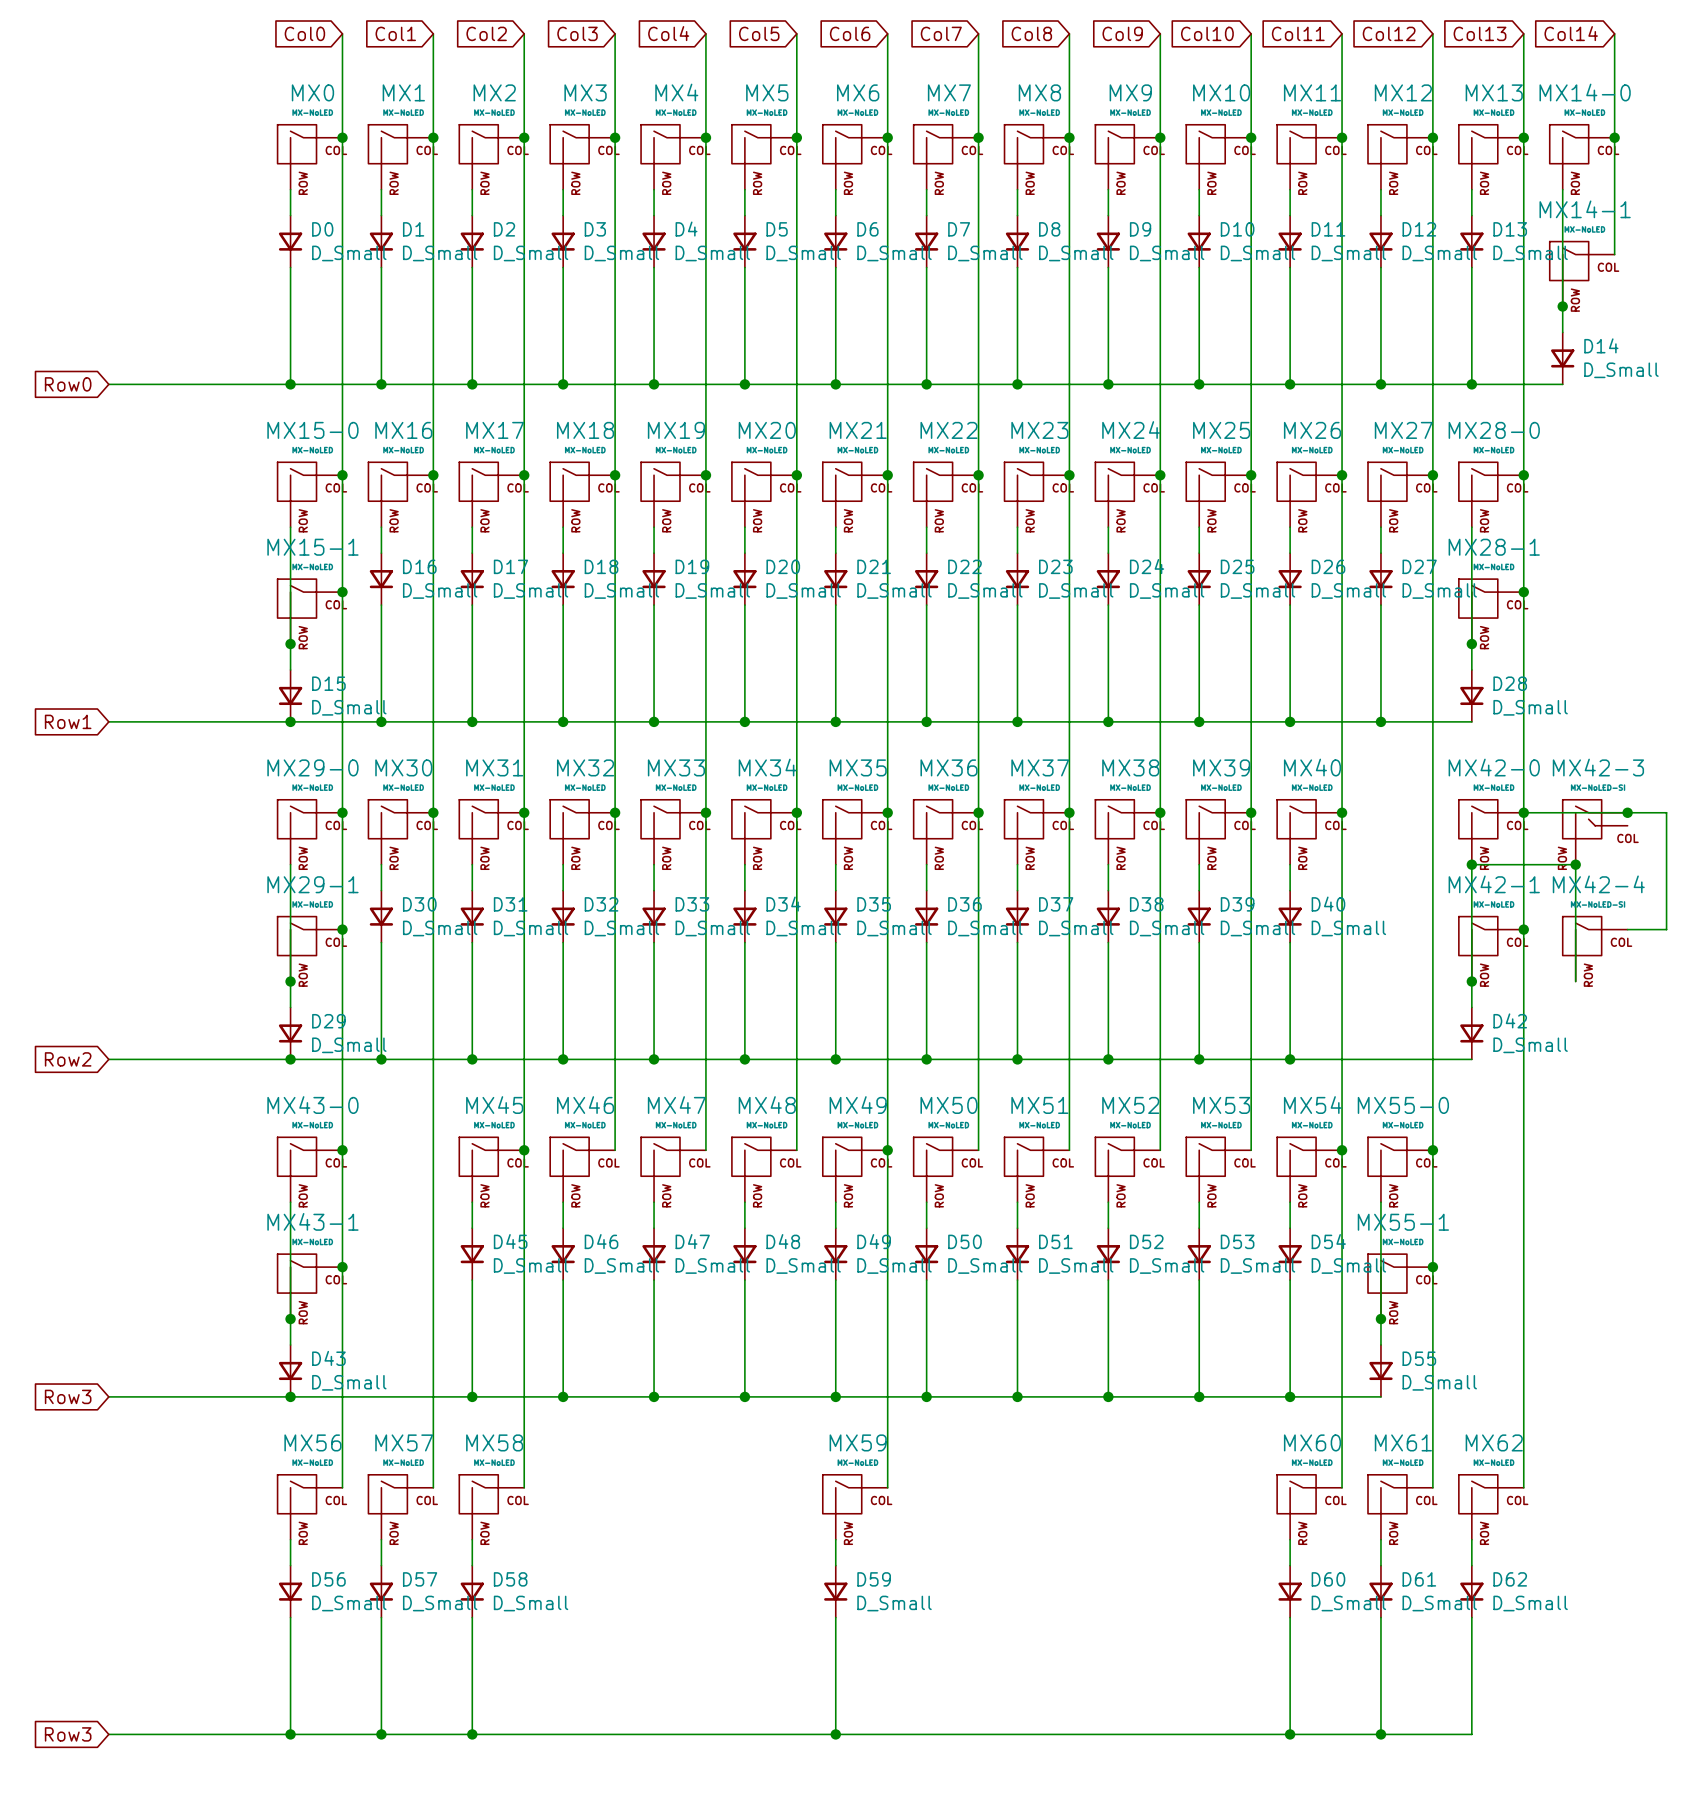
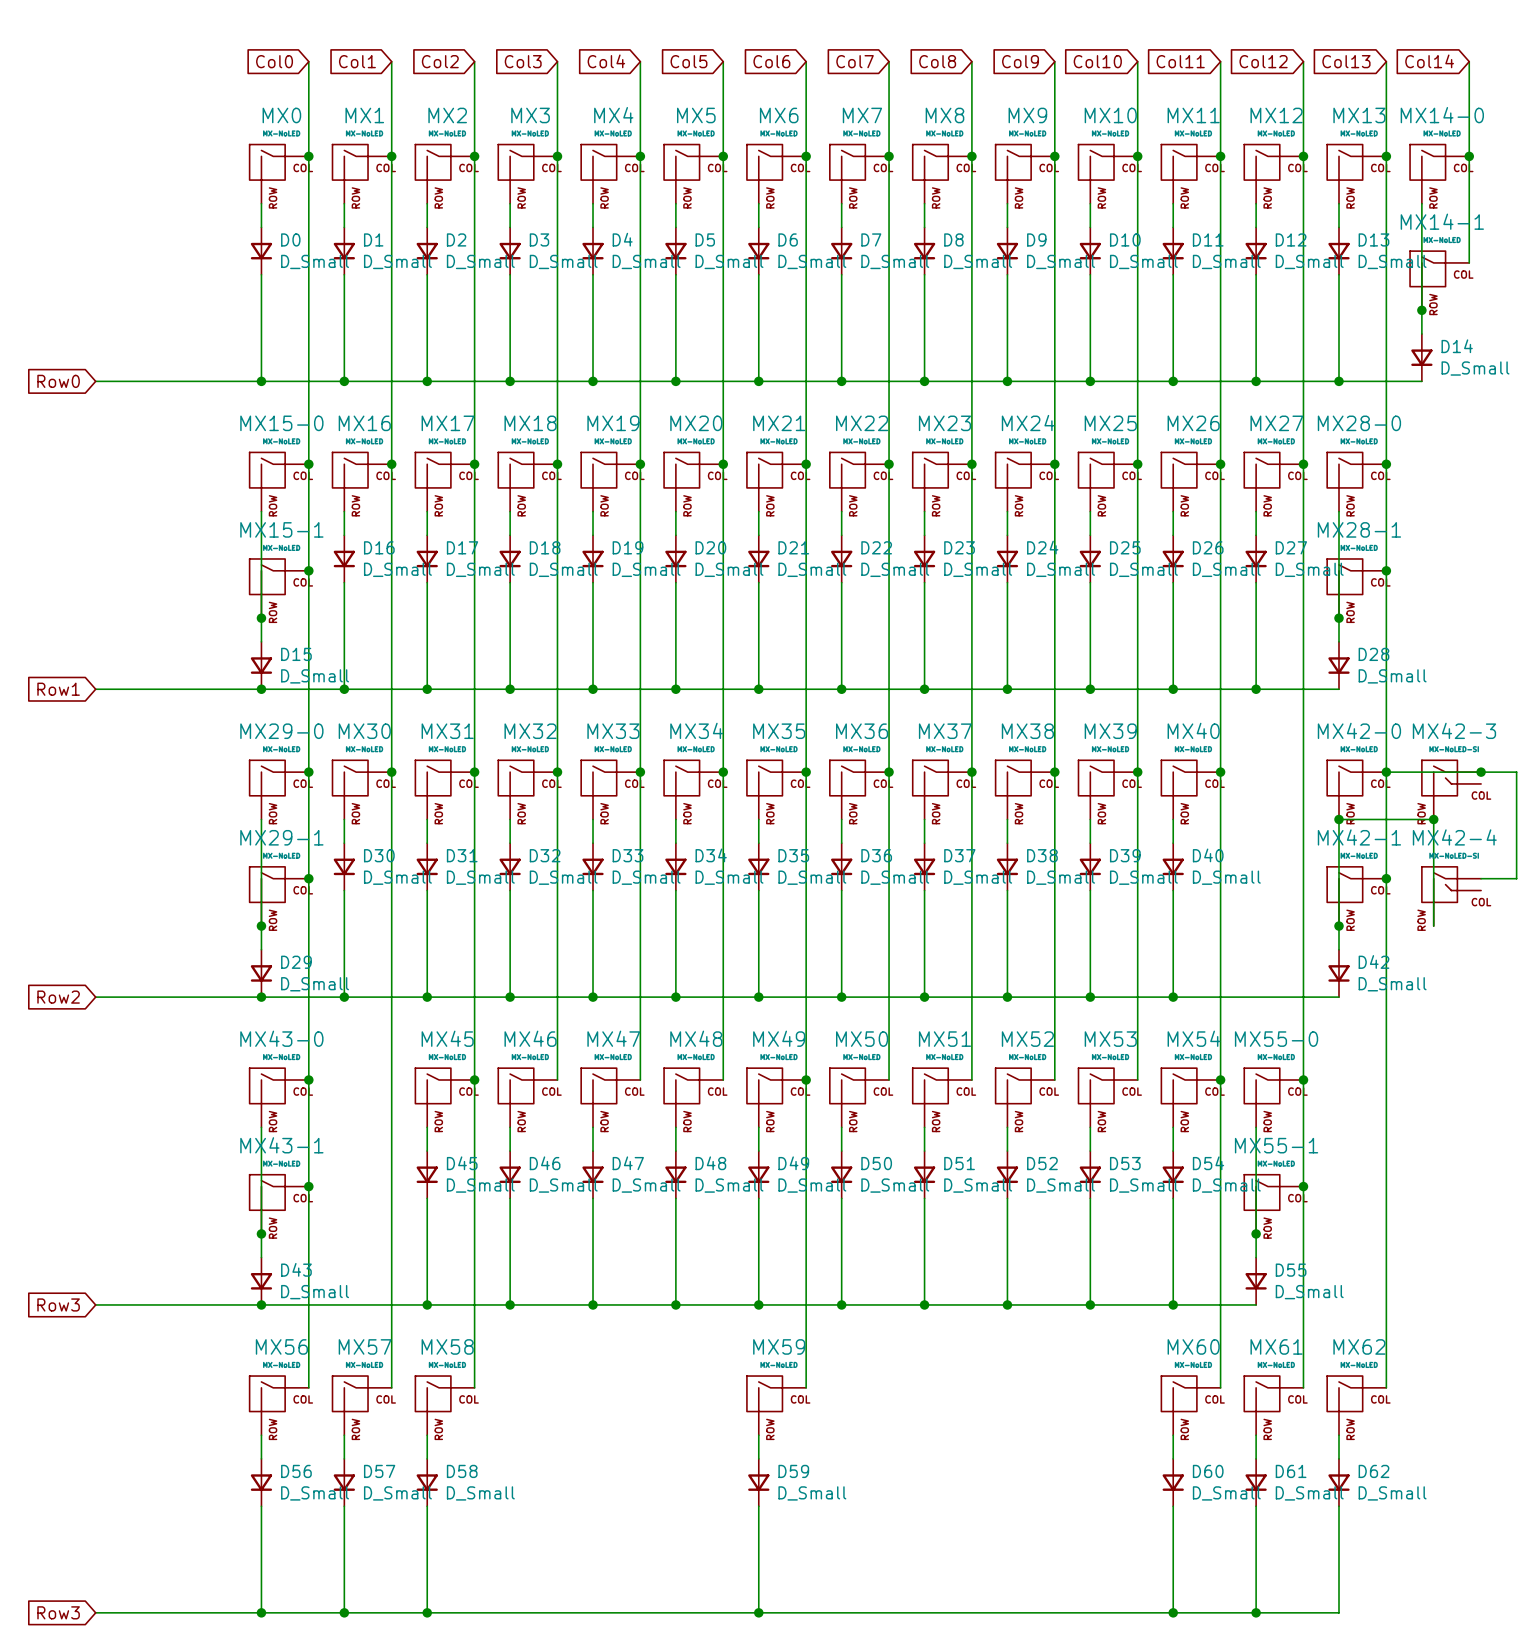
MX42-4 symbol: [1562, 916, 1628, 982] -> [1421, 866, 1482, 927]

